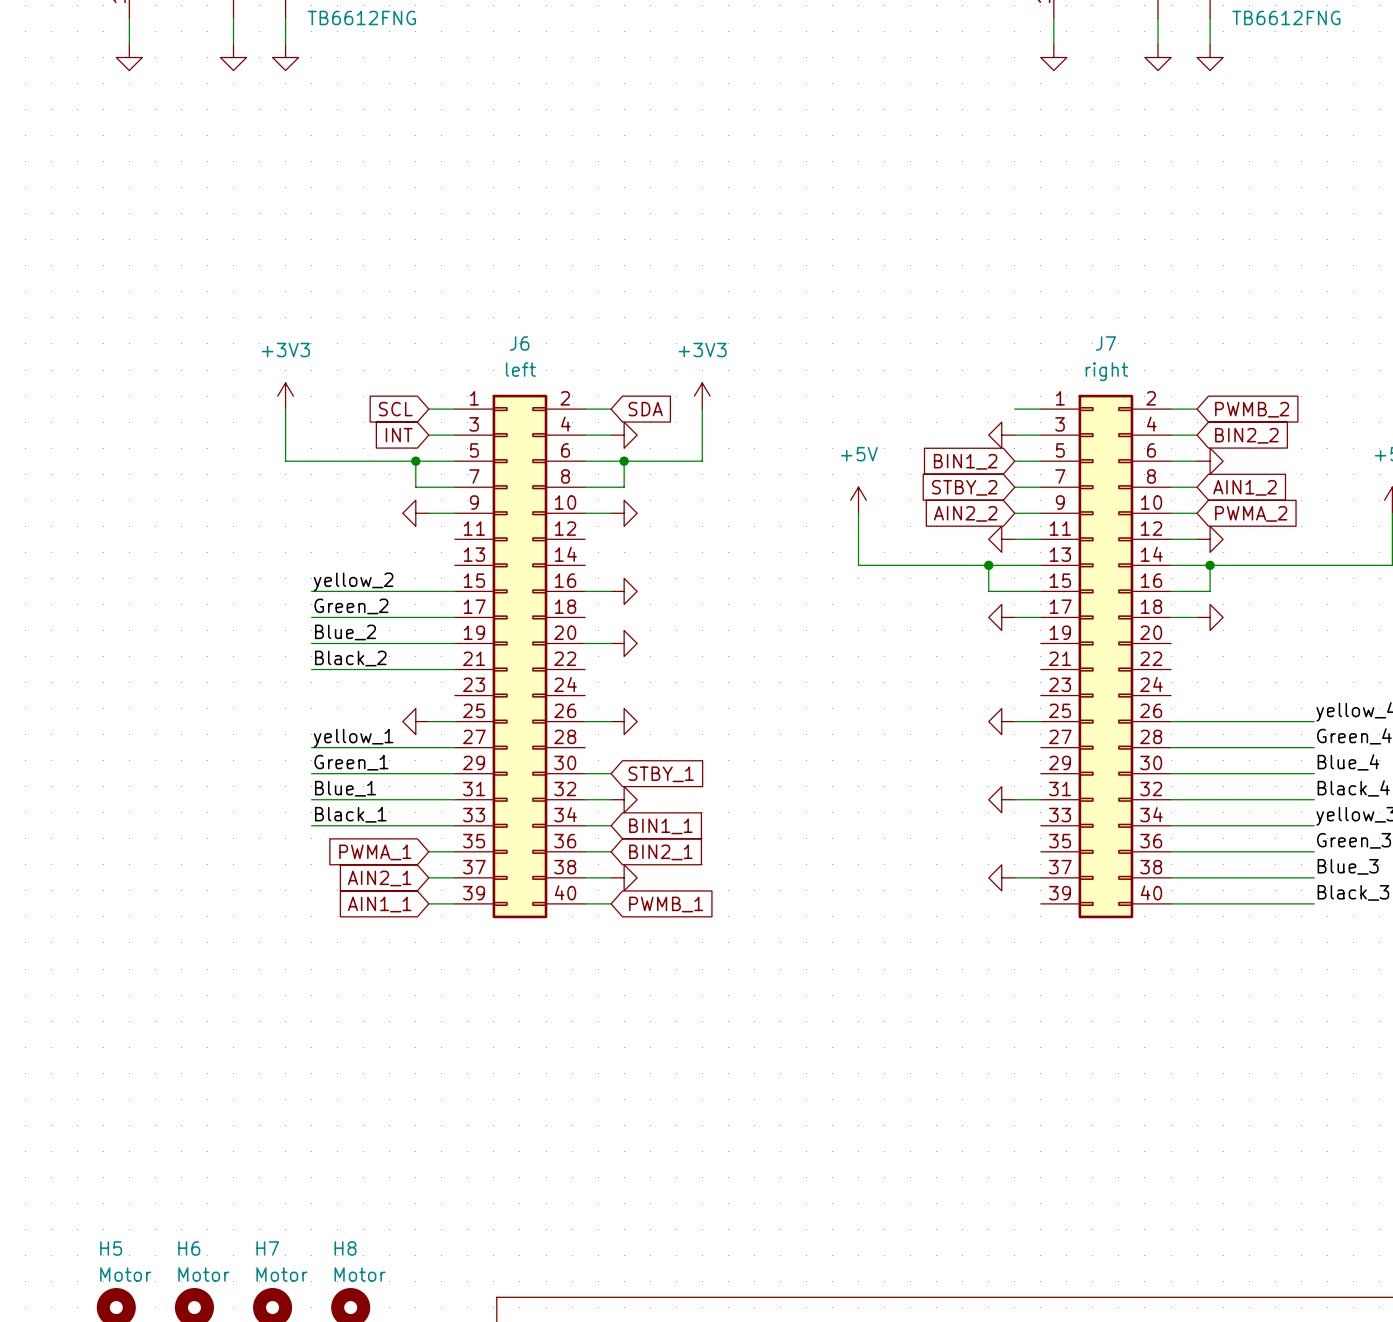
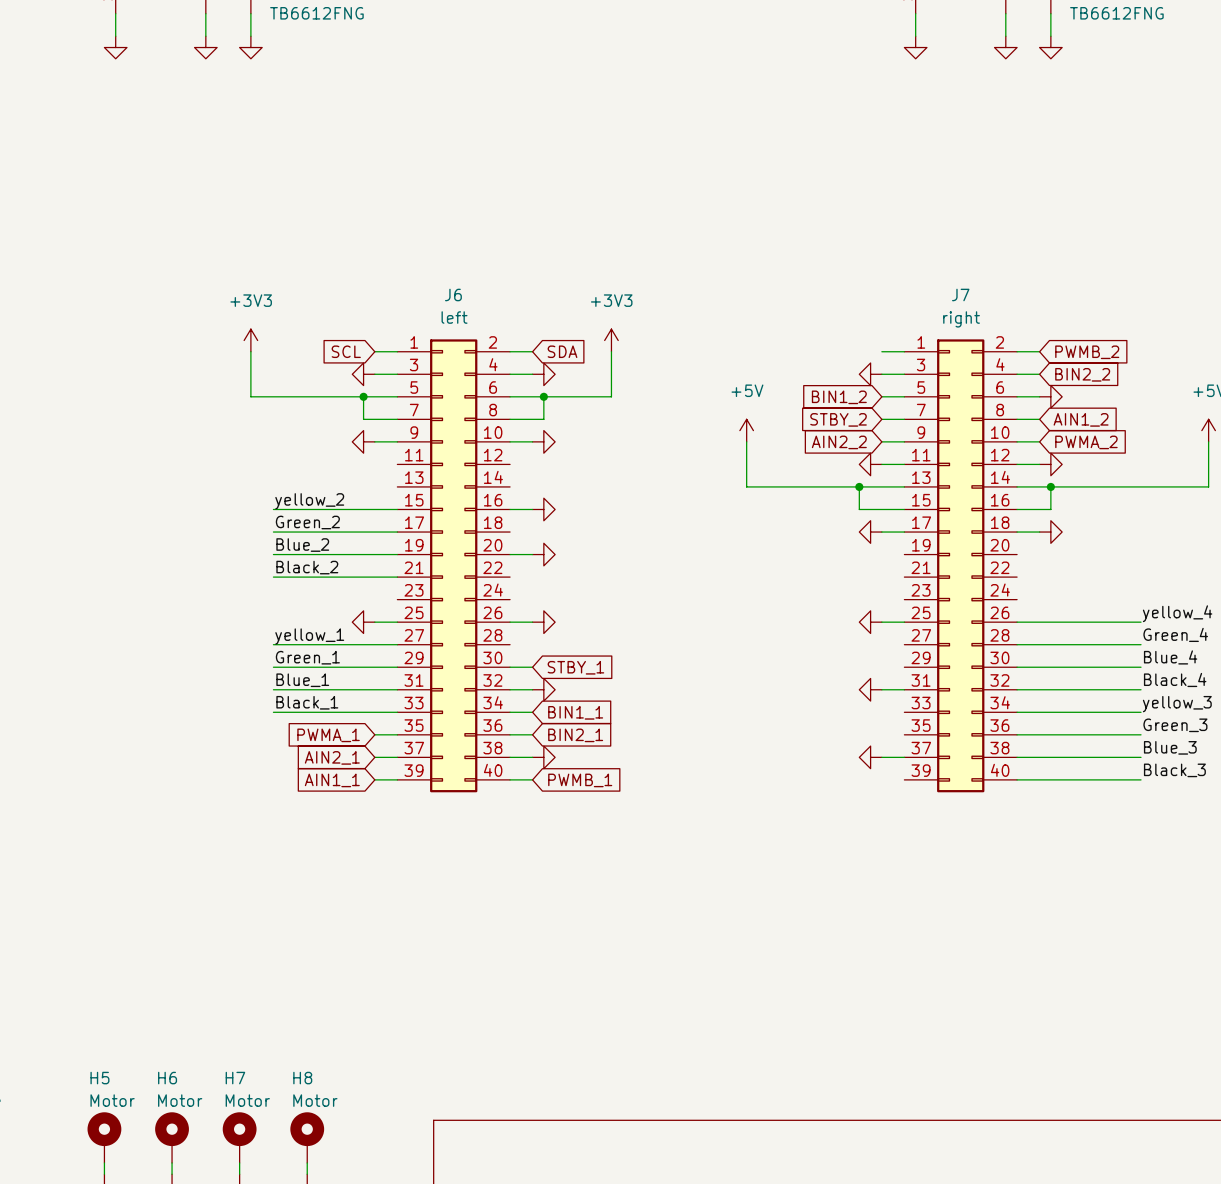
global label: INT (399, 435) -> none
power symbol: none -> (363, 374)

